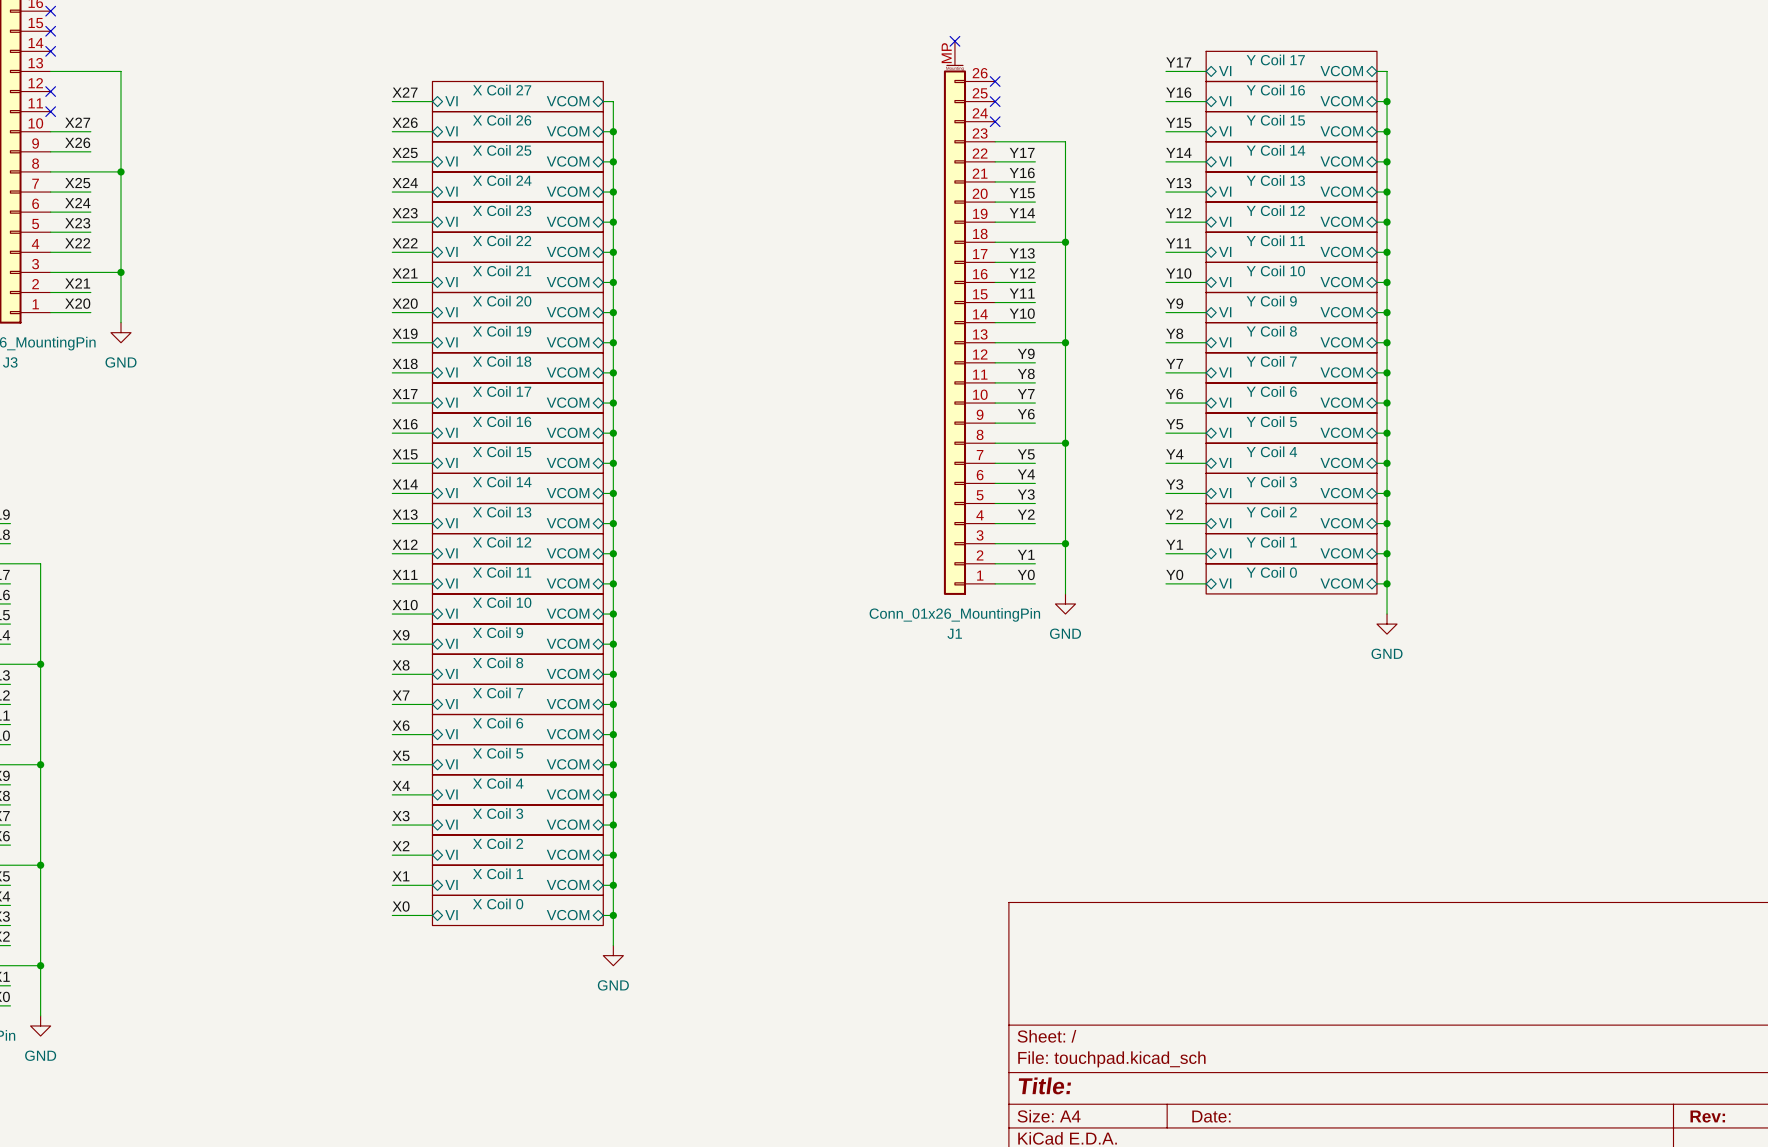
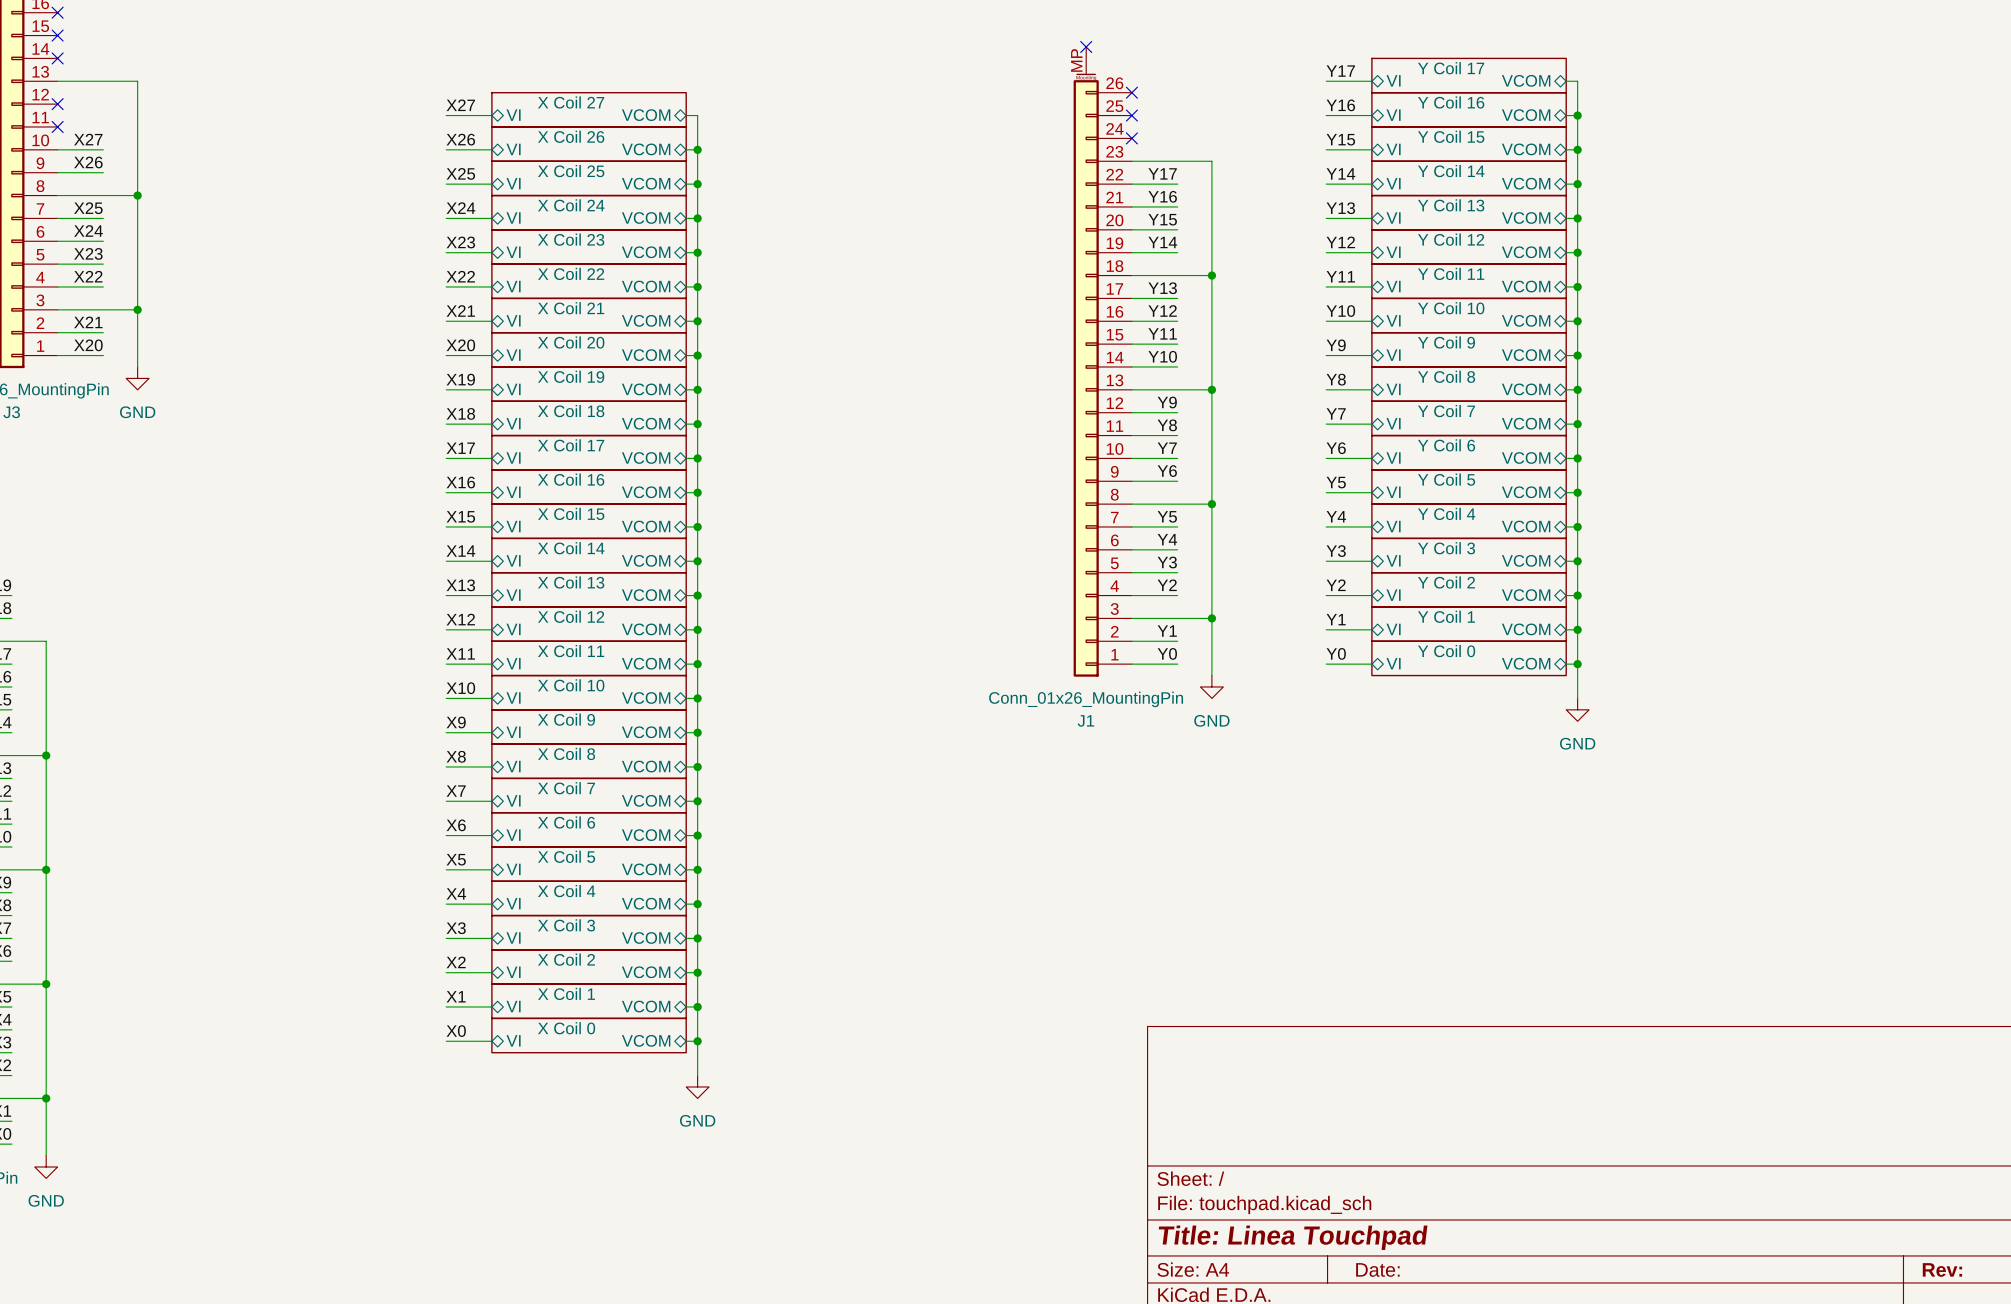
title block: Title: (1044, 1085) -> Title: Linea Touchpad (1293, 1237)

